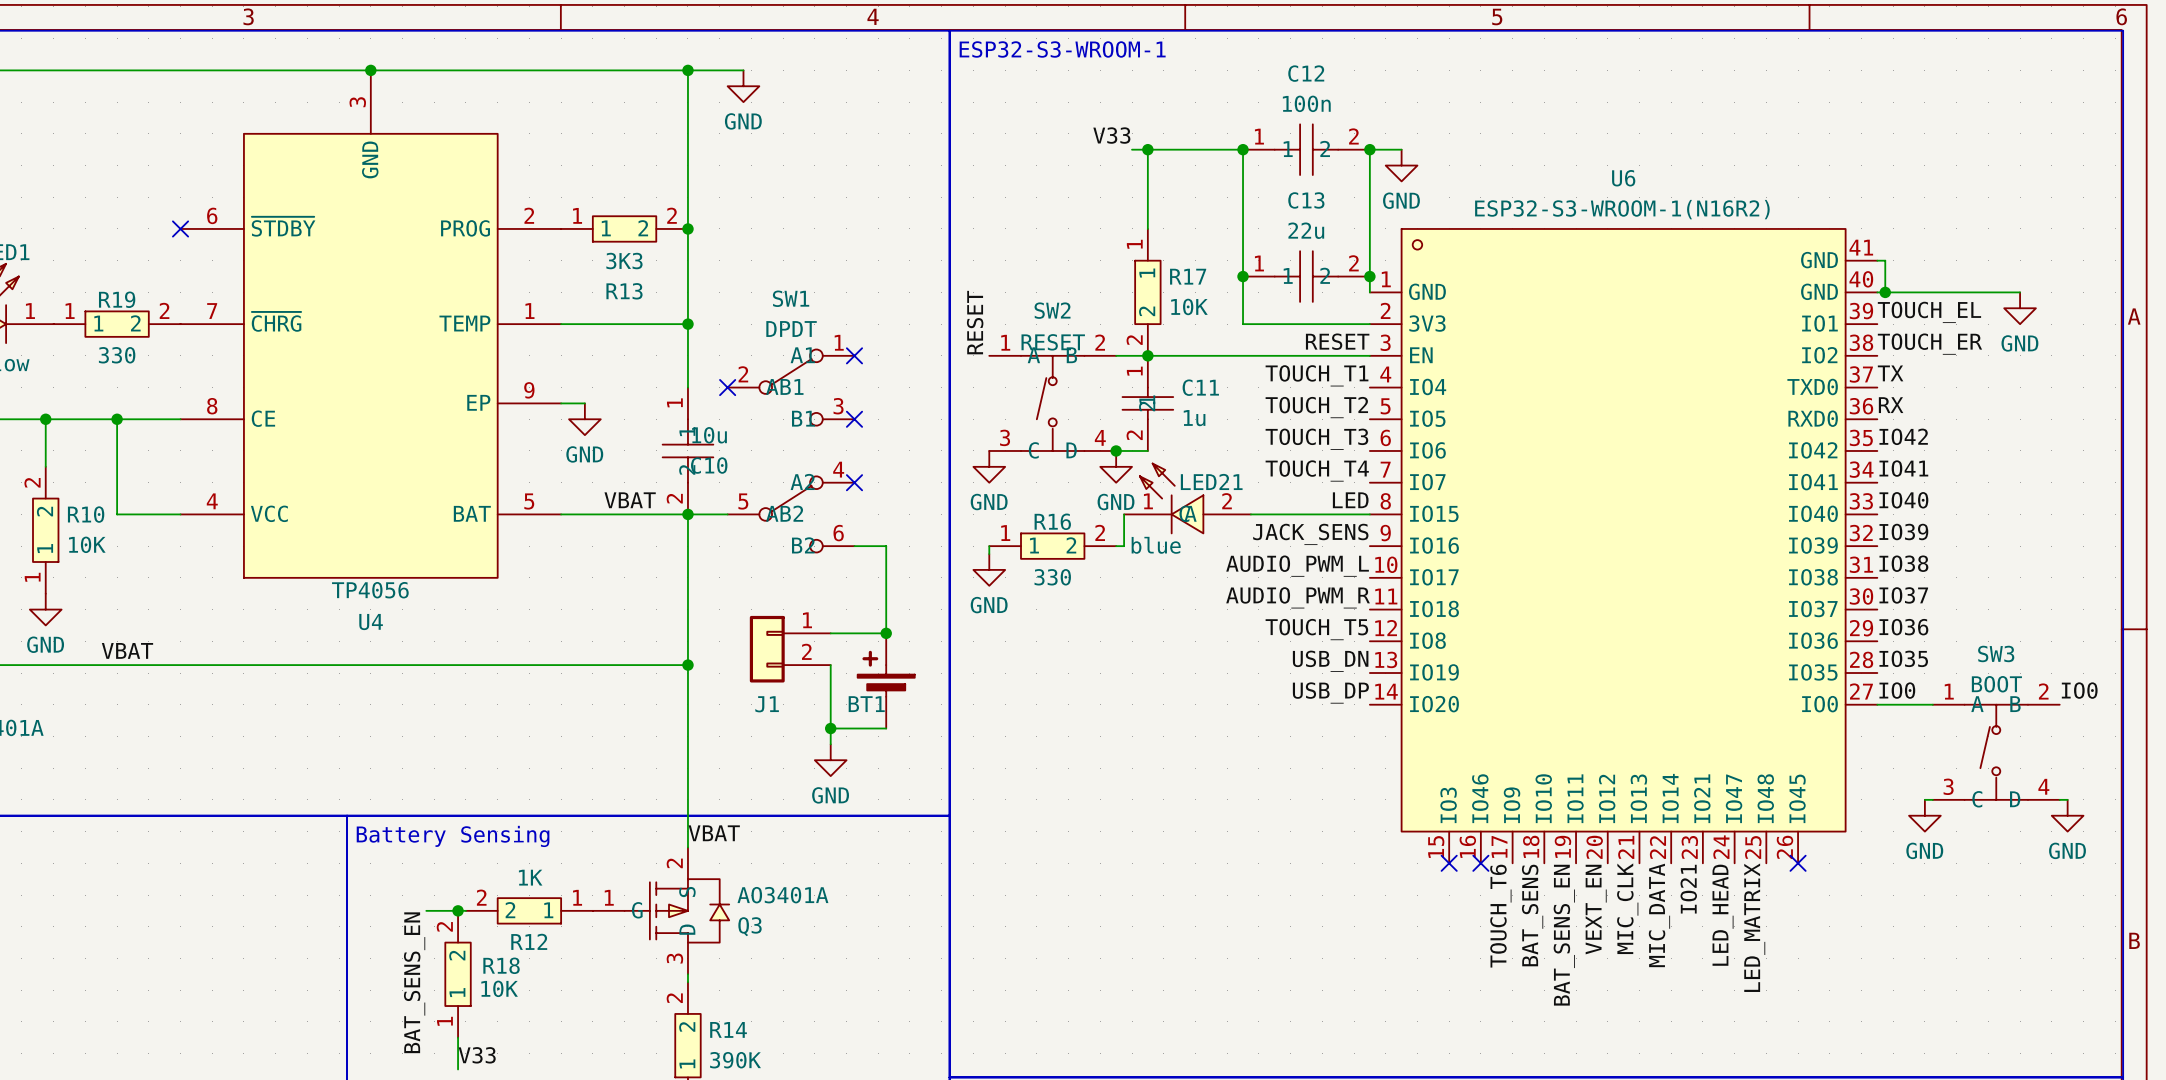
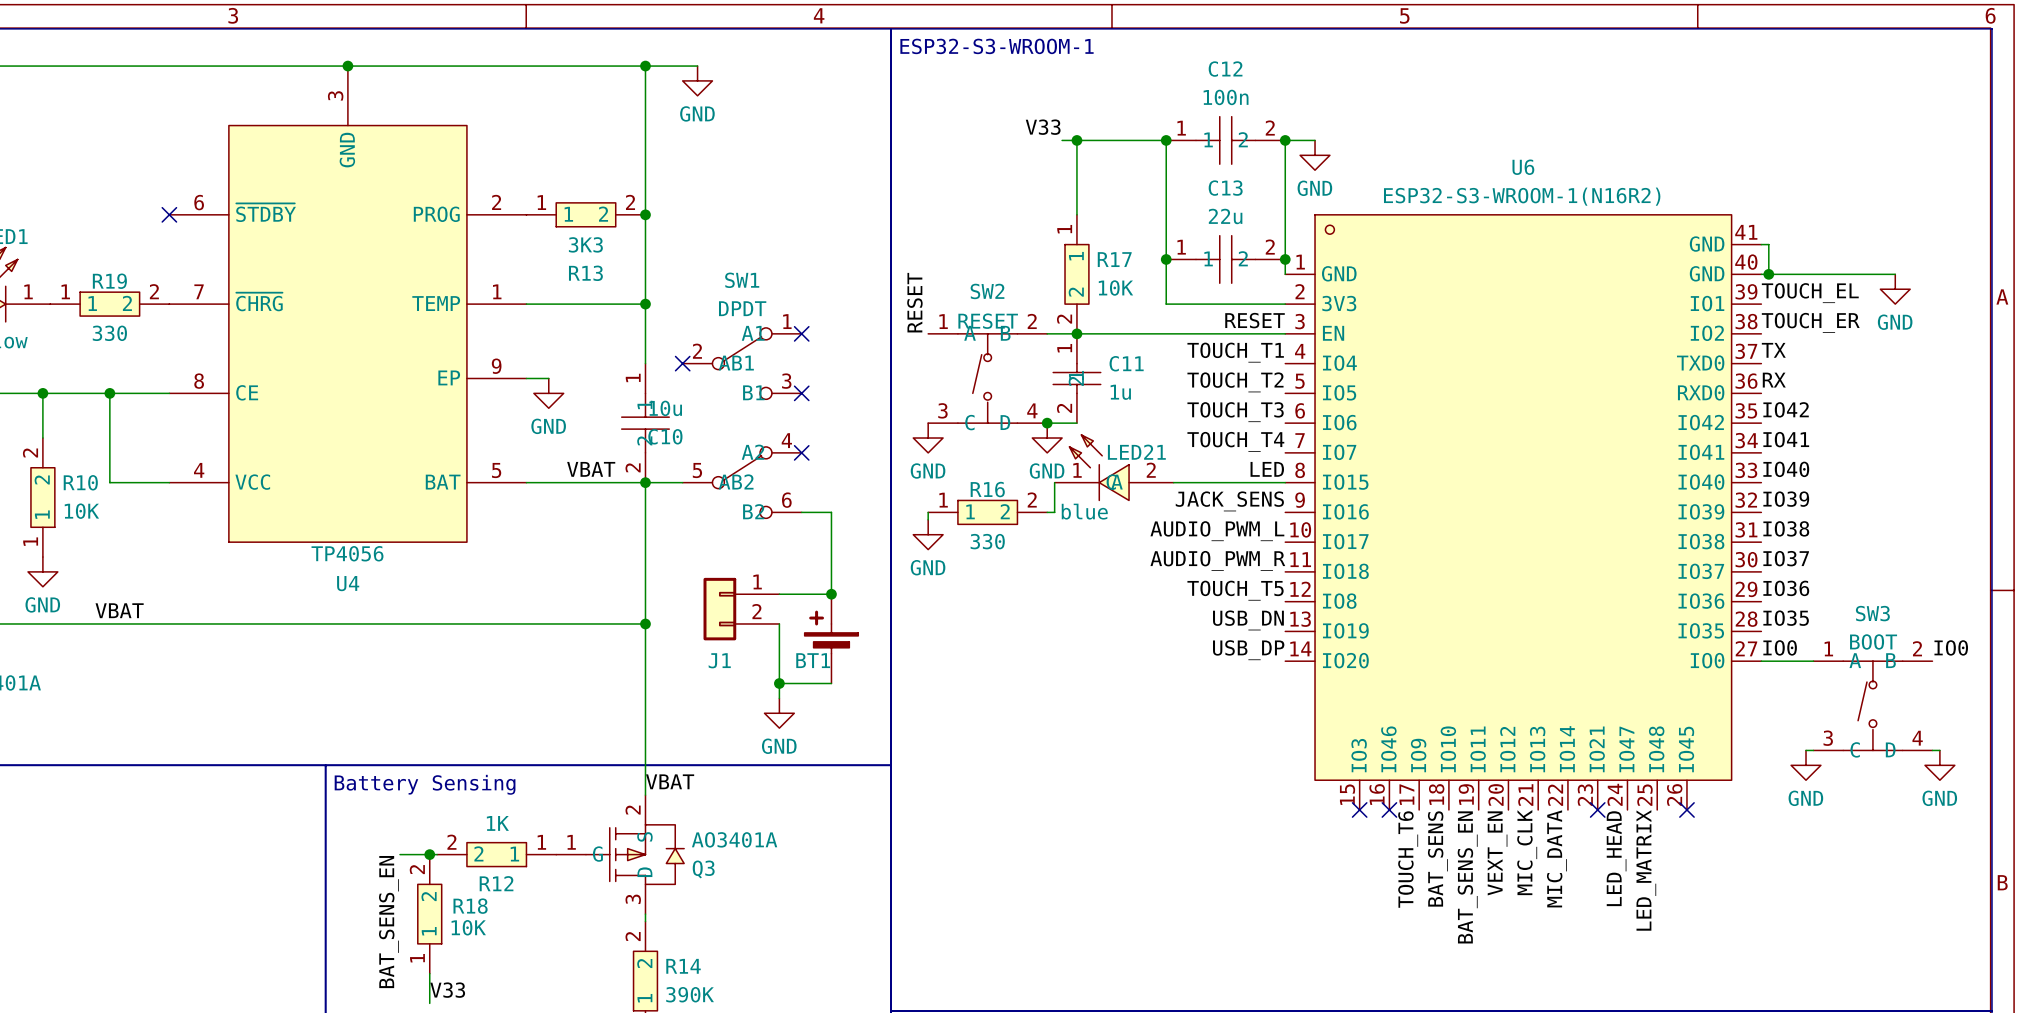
no-connect mark: none -> (1597, 809)
label: IO21 (1688, 889) -> none

